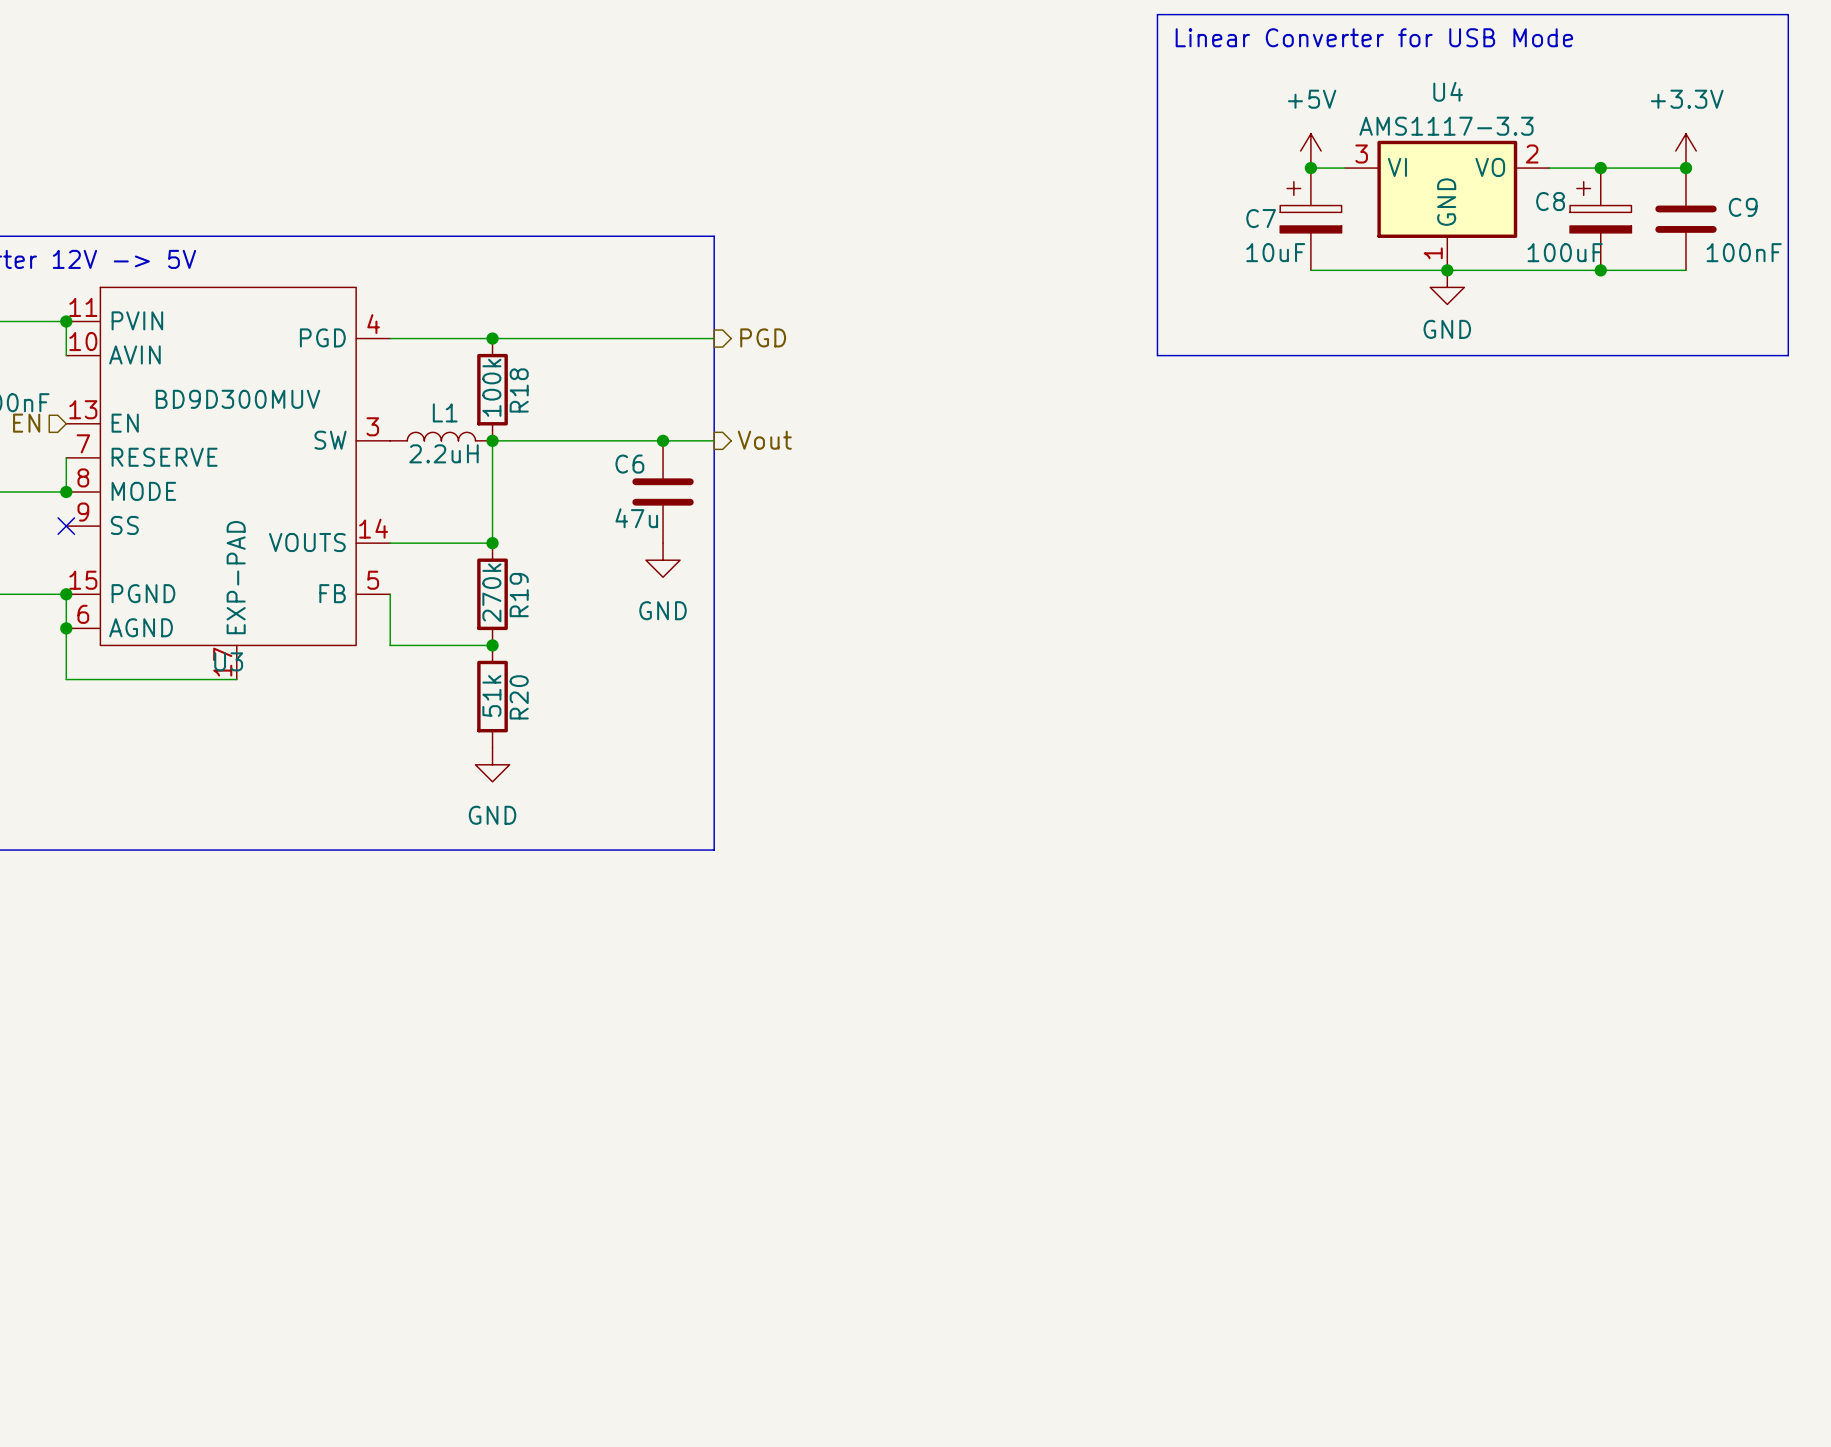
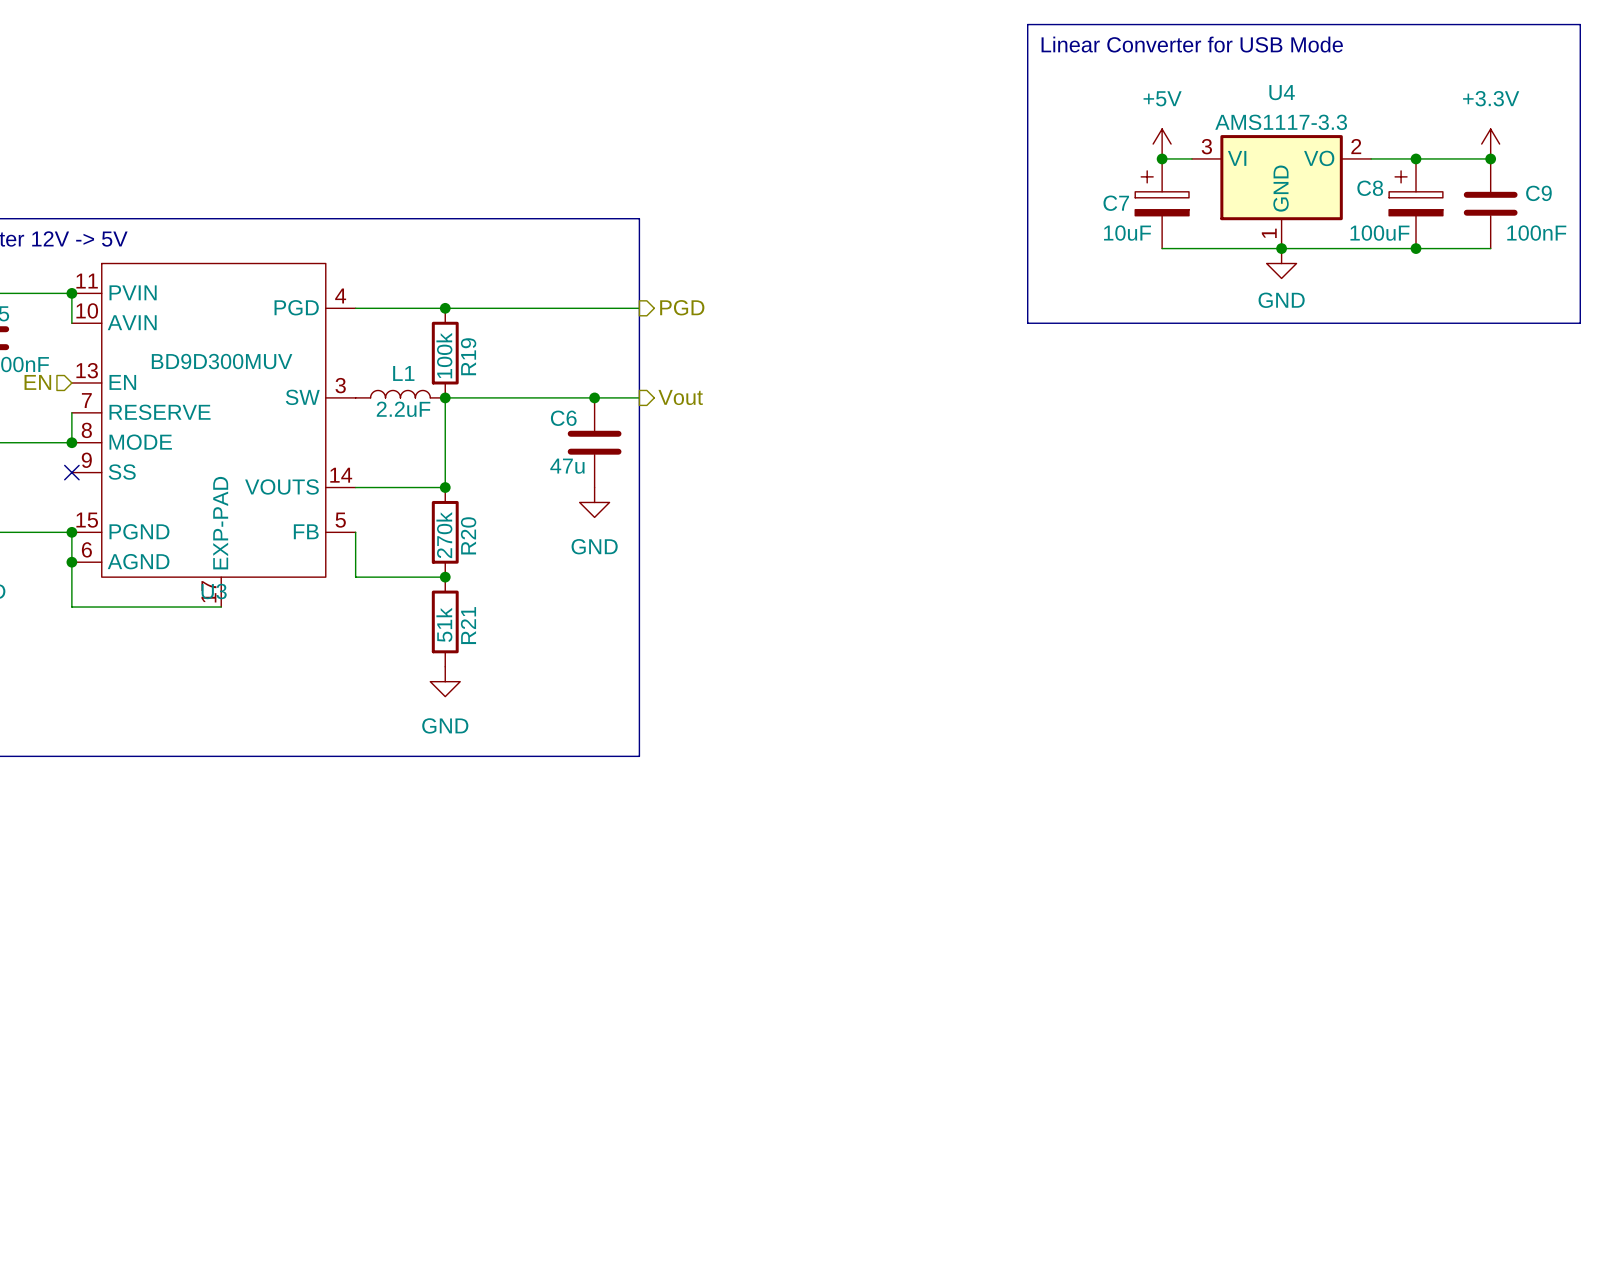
R18 name: R18 (519, 390) -> R19 (468, 356)
L1 value: 2.2uH (443, 453) -> 2.2uF (403, 409)
R19 name: R19 (519, 595) -> R20 (468, 535)
R20 name: R20 (519, 697) -> R21 (468, 625)

